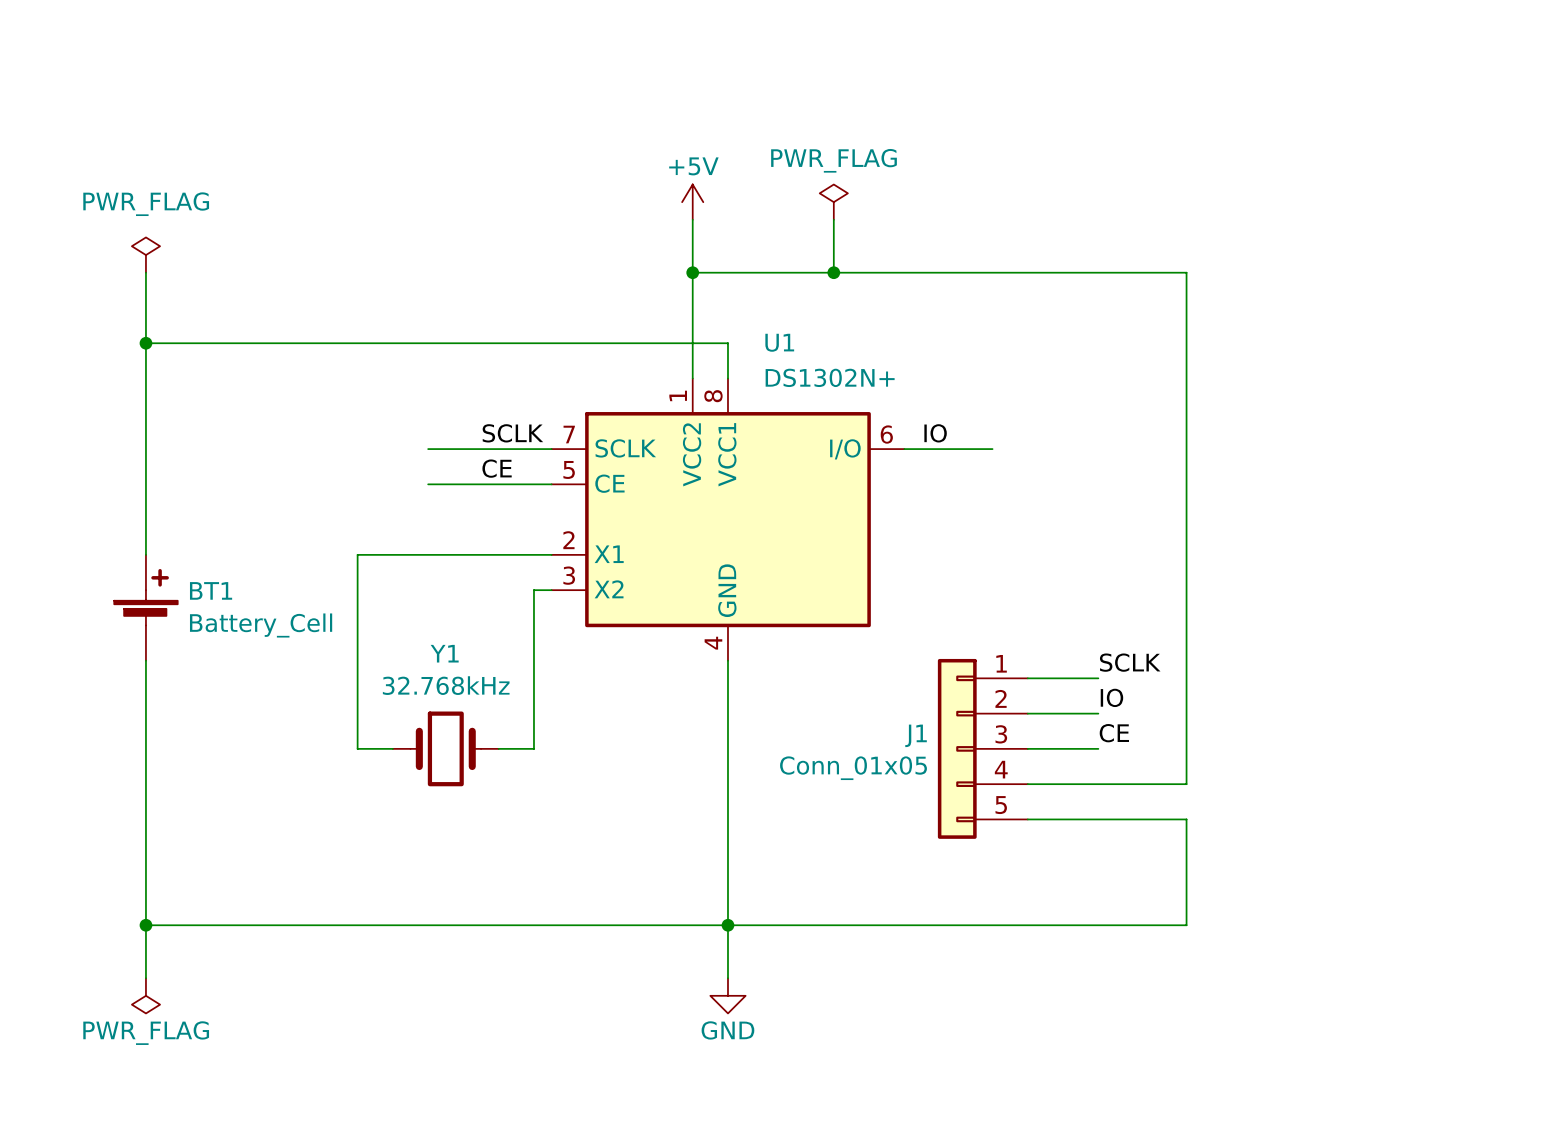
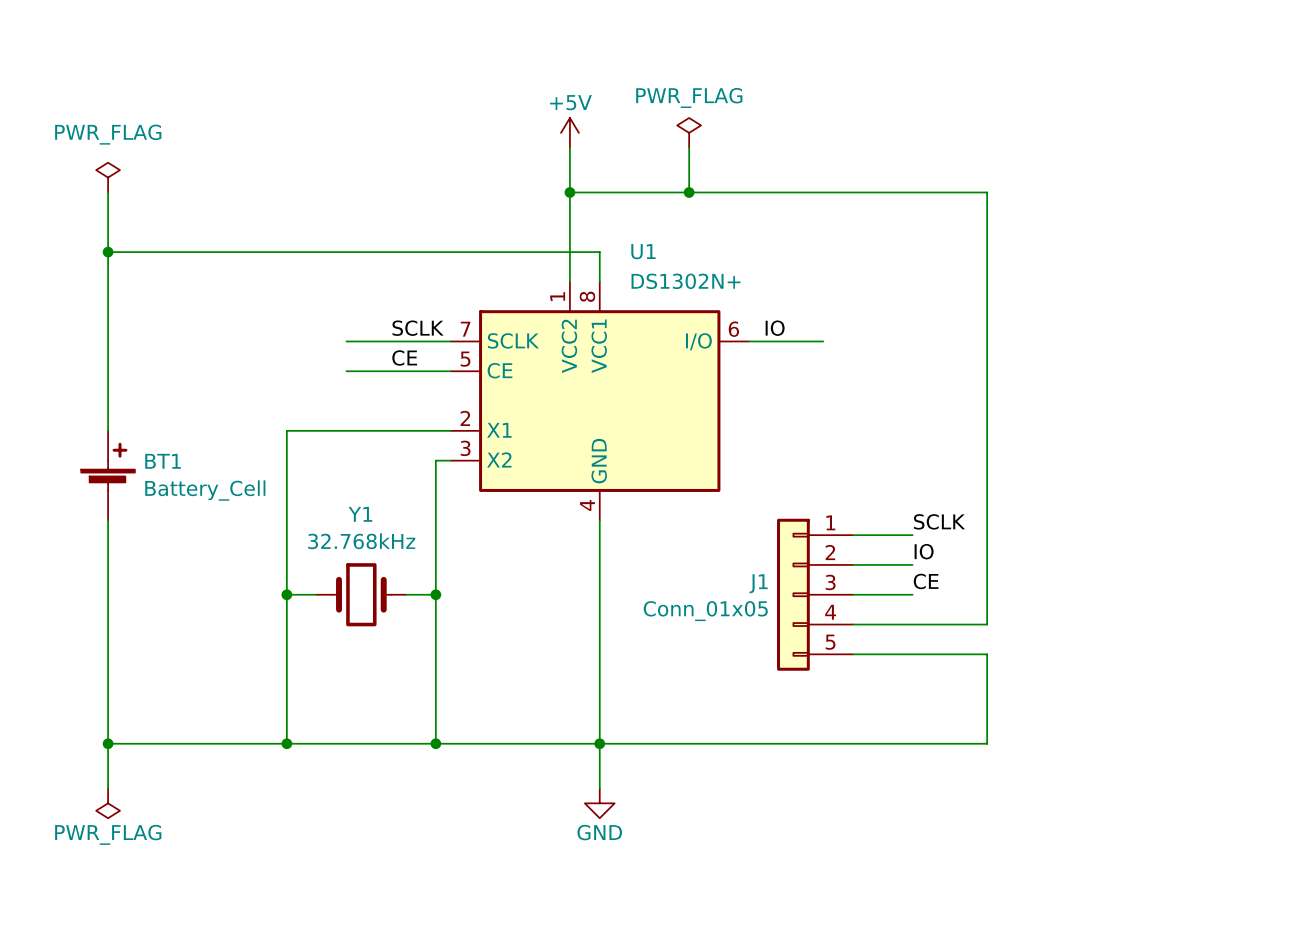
wire: none -> (286, 594) (286, 743)
junction: none -> (286, 594)
wire: none -> (435, 594) (435, 743)
junction: none -> (435, 594)
junction: none -> (286, 743)
junction: none -> (435, 743)

